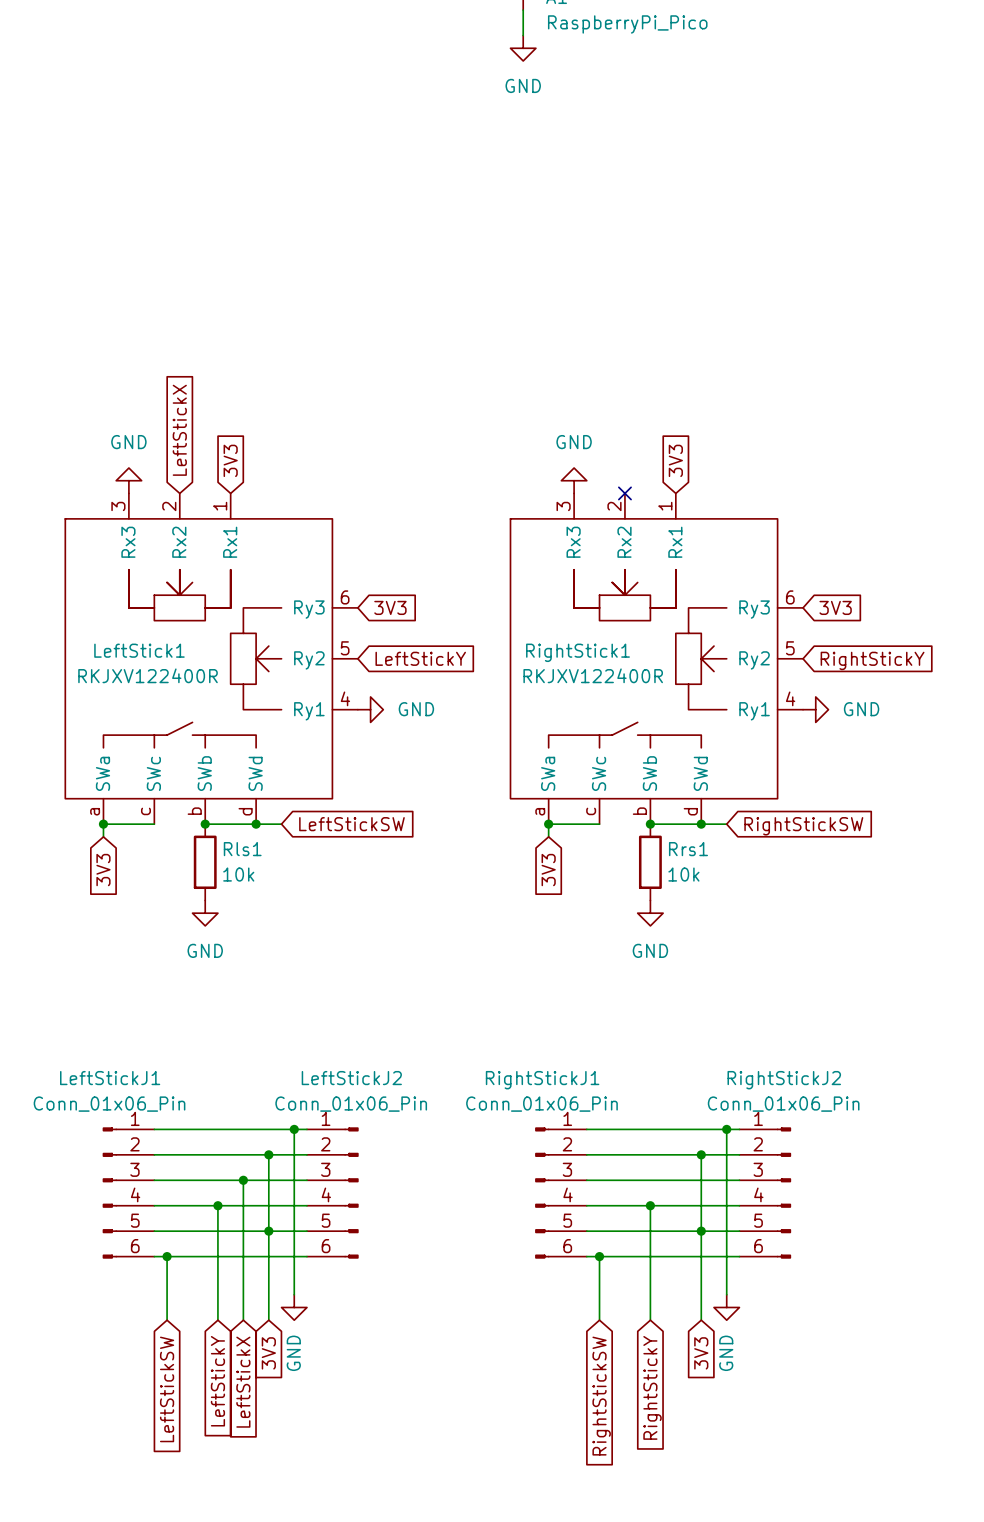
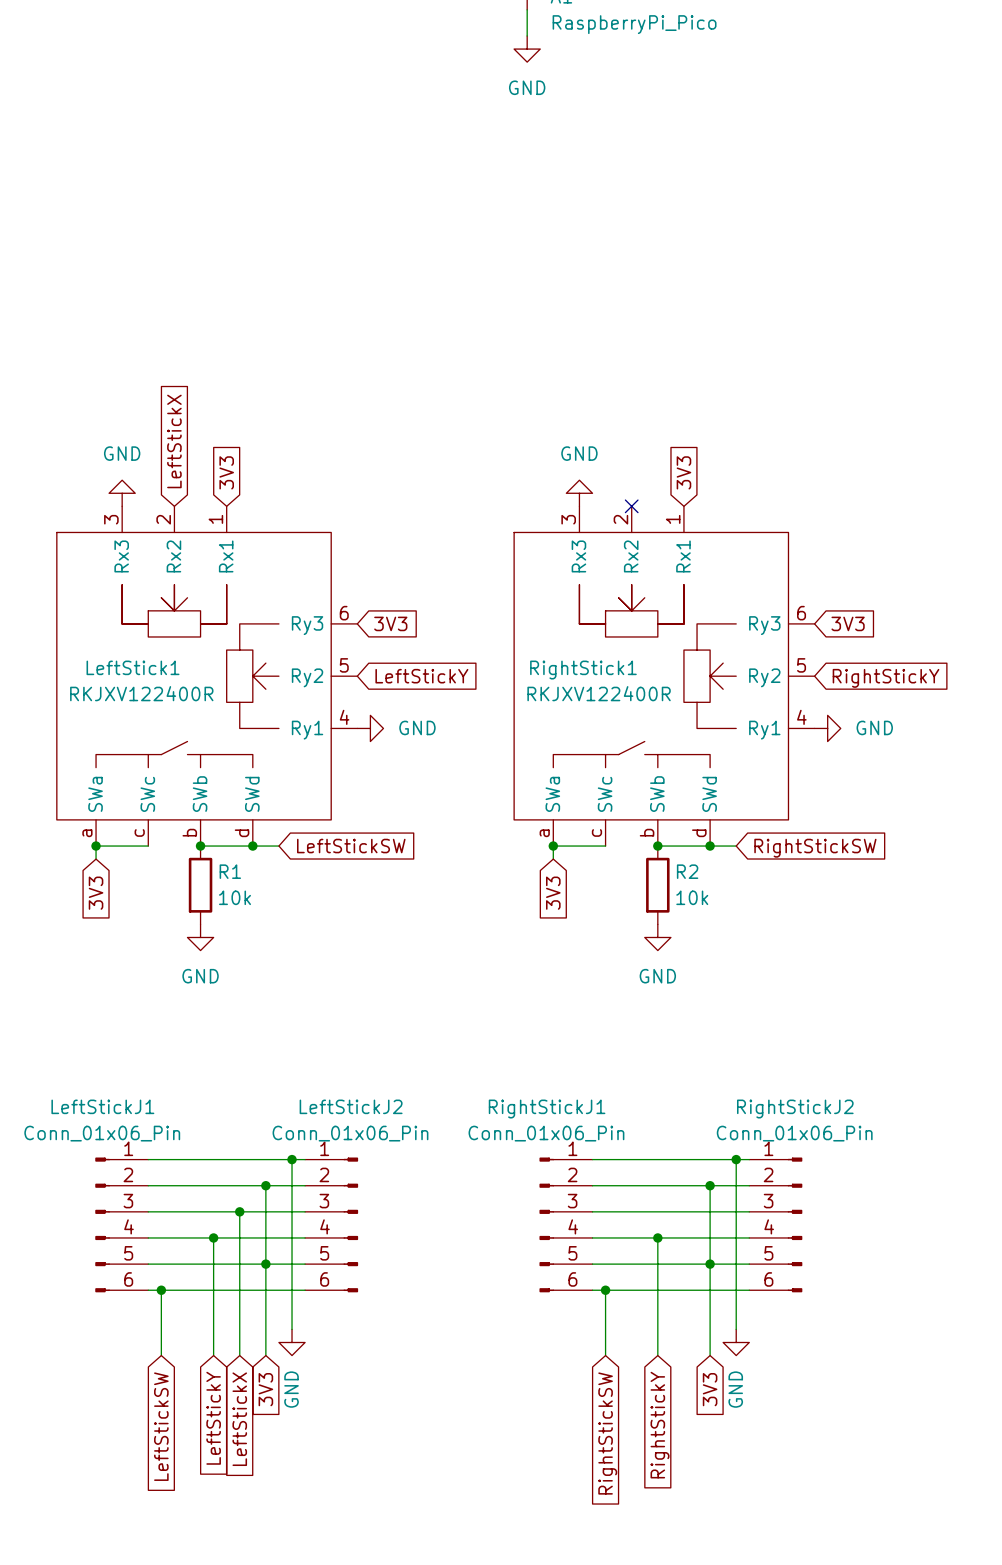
Rls1 name: Rls1 (242, 849) -> R1 (230, 871)
Rrs1 name: Rrs1 (688, 849) -> R2 (687, 871)

